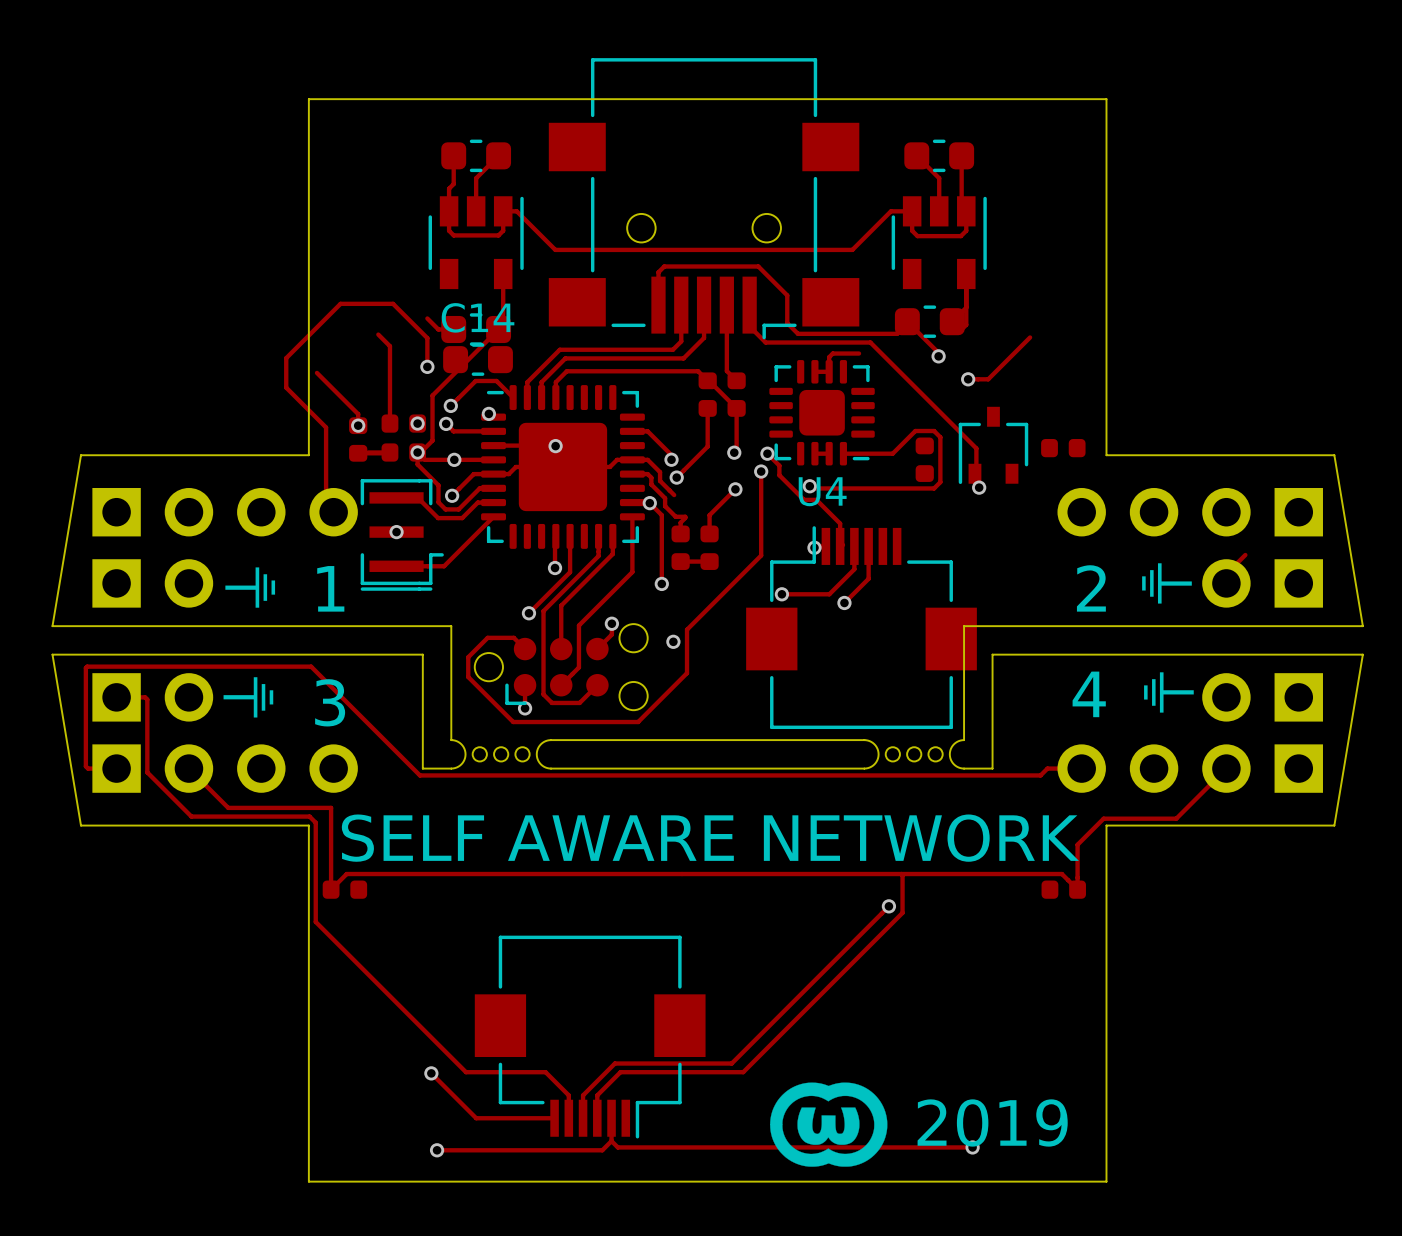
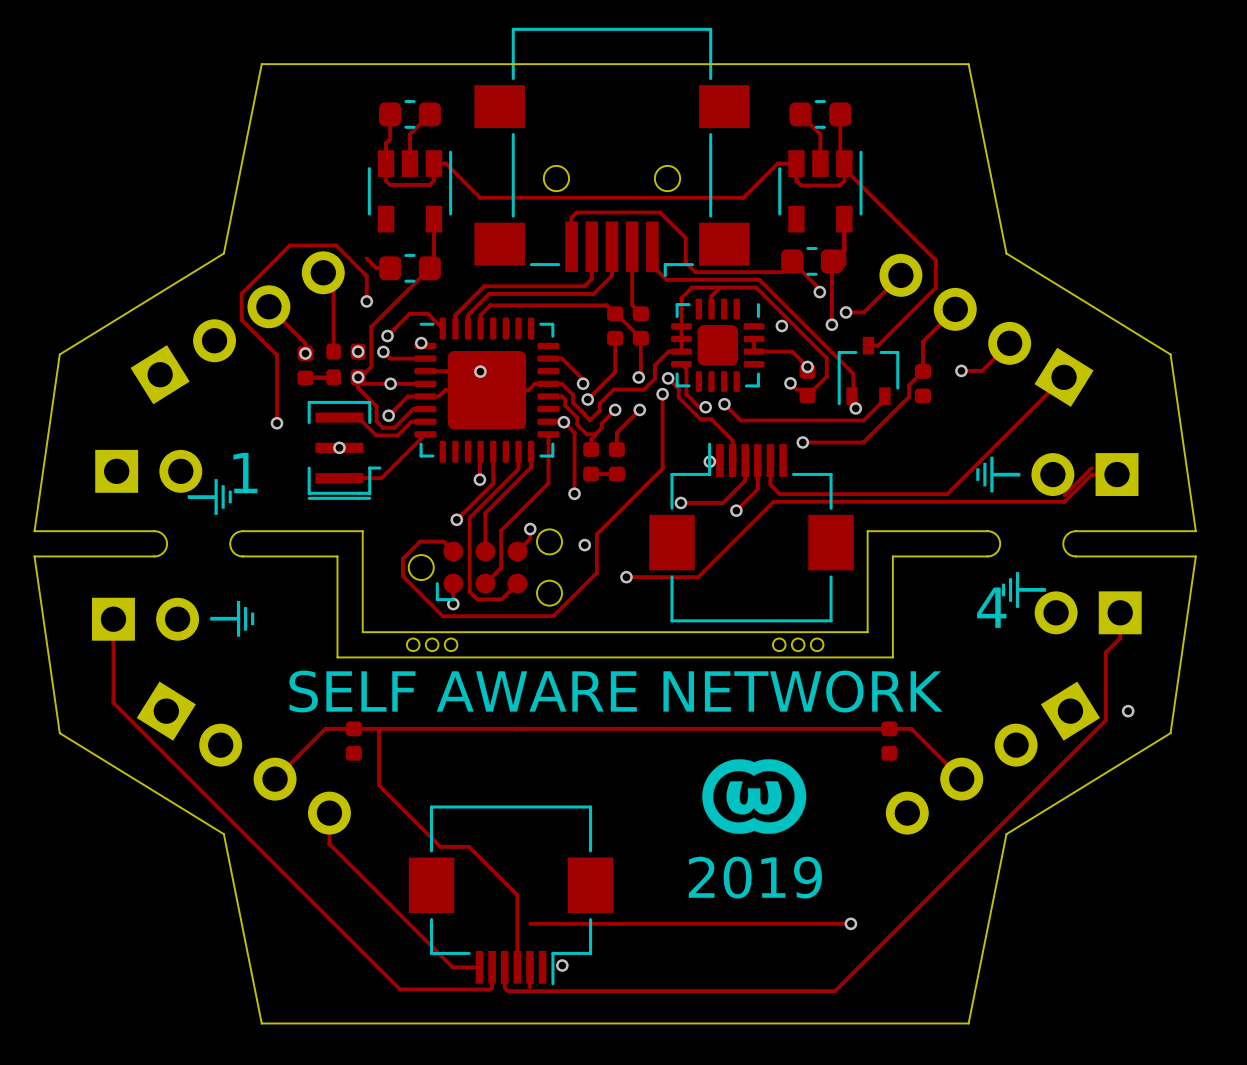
board edge: (308, 99) (308, 455) (80, 455) (52, 626) -> (261, 64) (223, 253) (59, 354) (34, 531)
board edge: (1106, 99) (1106, 455) (1334, 455) (1362, 626) -> (968, 64) (1006, 253) (1170, 354) (1195, 531)
track: none -> (844, 168) (935, 260) (935, 287) (878, 345) (868, 345)
track: none -> (831, 261) (831, 324)
track: none -> (719, 287) (711, 296) (711, 308)
track: (859, 353) (832, 353) (829, 357) (829, 371) (814, 371) -> none
C14: (478, 359) -> none
track: none -> (955, 309) (922, 341) (922, 371) (909, 385) (909, 396) (863, 442) (802, 442)
via: none -> (831, 324)
via: none -> (781, 326)
part: none -> (237, 327)
part: none -> (986, 330)
track: none -> (754, 338) (754, 351) (792, 351) (807, 366)
U4: (822, 412) -> none
track: none -> (1009, 343) (982, 370) (961, 370)
part: none -> (717, 345)
track: none -> (681, 364) (686, 369) (686, 394) (699, 407) (708, 407)
via: none -> (807, 366)
via: none -> (961, 370)
part rotation: 0° (1063, 448) -> 90° clockwise (922, 383)
track: none -> (1064, 377) (947, 494) (779, 494) (770, 484) (770, 460)
track: (814, 453) (829, 453) -> none
track: (843, 453) (892, 453) (915, 431) (934, 431) (940, 437) (940, 482) (934, 488) (812, 488) (809, 486) -> none
track: none -> (790, 383) (796, 389) (813, 389) (826, 376) (826, 358) (756, 287) (692, 287) (681, 298) (681, 351) (668, 351) (654, 365) (654, 378) (644, 389) (613, 389) (599, 403) (599, 410) (589, 420) (581, 411)
via: none -> (790, 383)
track: none -> (884, 396) (884, 399) (863, 420) (740, 420) (724, 404)
via: none -> (724, 404)
track: none -> (615, 409) (601, 423) (601, 427) (595, 434)
via: none -> (615, 409)
via: none -> (276, 423)
part: (225, 512) -> none
part: (1190, 512) -> none
via: none -> (802, 442)
track: none -> (1117, 474) (1091, 474) (1064, 501) (773, 501) (698, 577) (626, 577)
part position: (152, 583) -> (148, 471)
text position: ⏚ (1166, 583) -> ⏚ (998, 474)
part position: (1262, 583) -> (1084, 474)
text position: 1 (330, 588) -> 1 (245, 473)
text: 2 (1091, 588) -> none
board edge: (187, 626) (287, 626) -> (154, 531) (163, 534) (167, 543) (163, 552) (154, 556)
board edge: (422, 626) (451, 626) (451, 740) (461, 744) (465, 754) (461, 764) (451, 768) -> none
board edge: (992, 626) (964, 626) (964, 740) (953, 744) (949, 754) (953, 764) (964, 768) -> none
board edge: (1127, 626) (1227, 626) -> (987, 531) (996, 534) (1000, 543) (996, 552) (987, 556)
board edge: (52, 654) (80, 825) (308, 825) (308, 1181) -> (34, 556) (59, 733) (223, 834) (261, 1023)
board edge: (187, 654) (287, 654) -> (242, 531) (233, 534) (230, 543) (233, 552) (242, 556)
board edge: (394, 654) (422, 654) -> (362, 531) (362, 556)
board edge: (992, 654) (1021, 654) -> (867, 556) (867, 531)
board edge: (1127, 654) (1227, 654) -> (1075, 531) (1066, 534) (1063, 543) (1066, 552) (1075, 556)
board edge: (1362, 654) (1334, 825) (1106, 825) (1106, 1181) -> (1195, 556) (1170, 733) (1006, 834) (968, 1023)
via: none -> (626, 577)
text position: 4 (1089, 694) -> 4 (991, 607)
track: (116, 697) (145, 697) (147, 699) (147, 772) (191, 816) (309, 816) (315, 822) (315, 921) (466, 1072) (545, 1072) (568, 1095) (568, 1118) -> (113, 619) (113, 702) (400, 989) (490, 989) (492, 987) (492, 967)
part position: (152, 697) -> (145, 619)
text position: ⏚ (248, 697) -> ⏚ (232, 618)
part position: (1262, 697) -> (1088, 612)
text: 3 (330, 702) -> none
board edge: (422, 740) (422, 768) -> (337, 556) (337, 657) (362, 657)
board edge: none -> (362, 632) (476, 632)
board edge: (551, 740) (540, 744) (536, 754) (540, 764) (551, 768) -> (387, 657) (476, 657)
board edge: (864, 740) (874, 744) (878, 754) (874, 764) (864, 768) -> (842, 657) (754, 657)
board edge: none -> (754, 632) (867, 632)
board edge: (992, 740) (992, 768) -> (892, 556) (892, 657) (867, 657)
track: (116, 768) (88, 768) (85, 766) (87, 666) (311, 666) (419, 775) (1040, 775) (1047, 768) (1081, 768) -> none
track: (188, 768) (228, 807) (331, 807) (331, 889) (346, 874) (1061, 874) (1077, 889) (1077, 844) (1103, 818) (1176, 818) (1226, 768) -> none
part: (225, 768) -> none
part: (1190, 768) -> none
via: none -> (1128, 711)
text position: SELF AWARE NETWORK (710, 838) -> SELF AWARE NETWORK (616, 691)
track: (901, 874) (902, 912) (743, 1072) (620, 1072) (597, 1095) -> (379, 728) (379, 785) (440, 846) (469, 846) (517, 895) (517, 947)
part: none -> (243, 758)
part: none -> (992, 758)
part rotation: 0° (344, 889) -> 90° clockwise (353, 741)
part position: (344, 889) -> (353, 741)
part rotation: 0° (1063, 889) -> 90° clockwise (889, 741)
part position: (1063, 889) -> (889, 741)
track: none -> (275, 779) (325, 728) (911, 728) (961, 779)
track: (888, 906) (731, 1063) (614, 1063) (583, 1095) (583, 1118) -> (1120, 612) (1120, 638) (1105, 652) (1105, 720) (835, 991) (508, 991) (504, 987) (504, 967)
via: (888, 906) -> none
track: none -> (530, 923) (850, 923)
track: (431, 1073) (476, 1118) (524, 1118) -> (329, 813) (329, 844) (452, 967)
via: (431, 1073) -> none
via: none -> (562, 965)
text position: 2019 (992, 1122) -> 2019 (755, 877)
drawing position: (828, 1124) -> (754, 796)
track: (972, 1147) (617, 1147) (611, 1141) (602, 1150) (437, 1150) -> none
via position: (972, 1147) -> (850, 923)
via: (437, 1150) -> none

